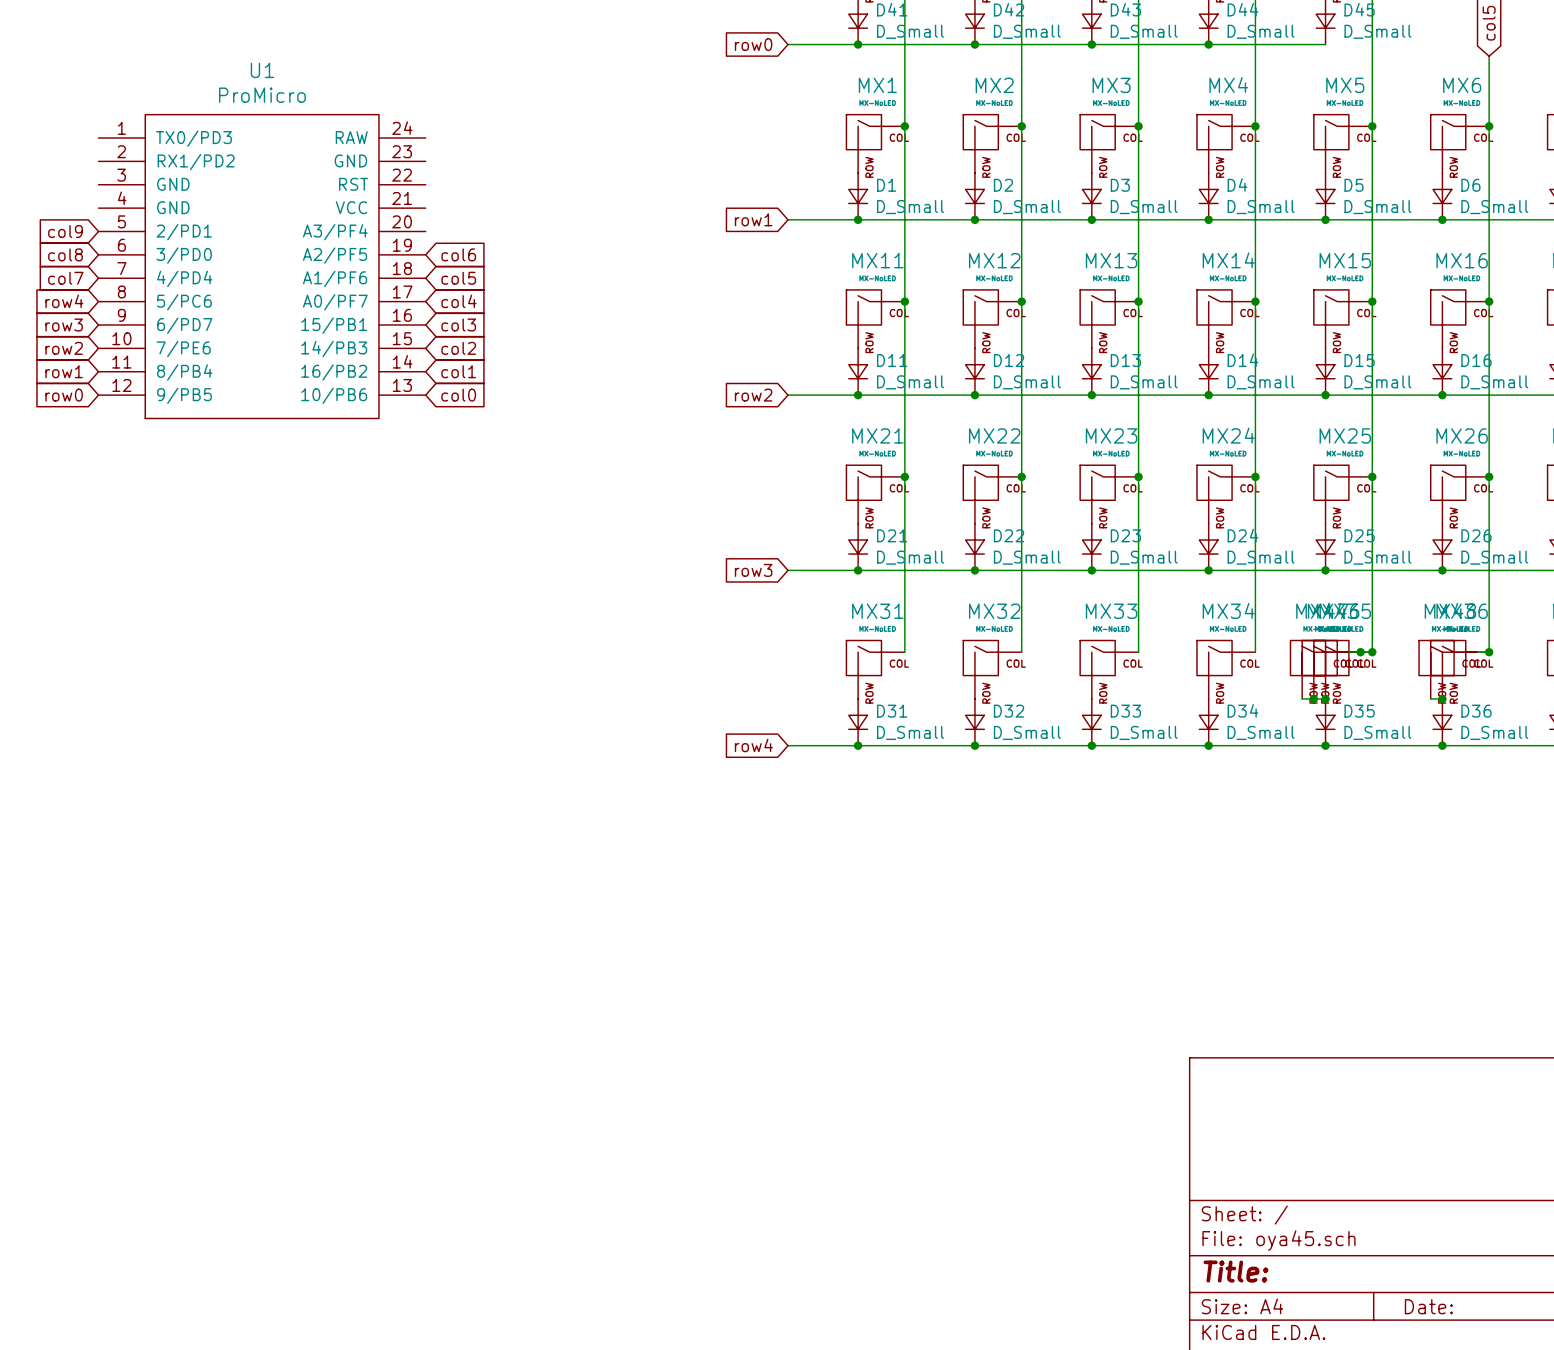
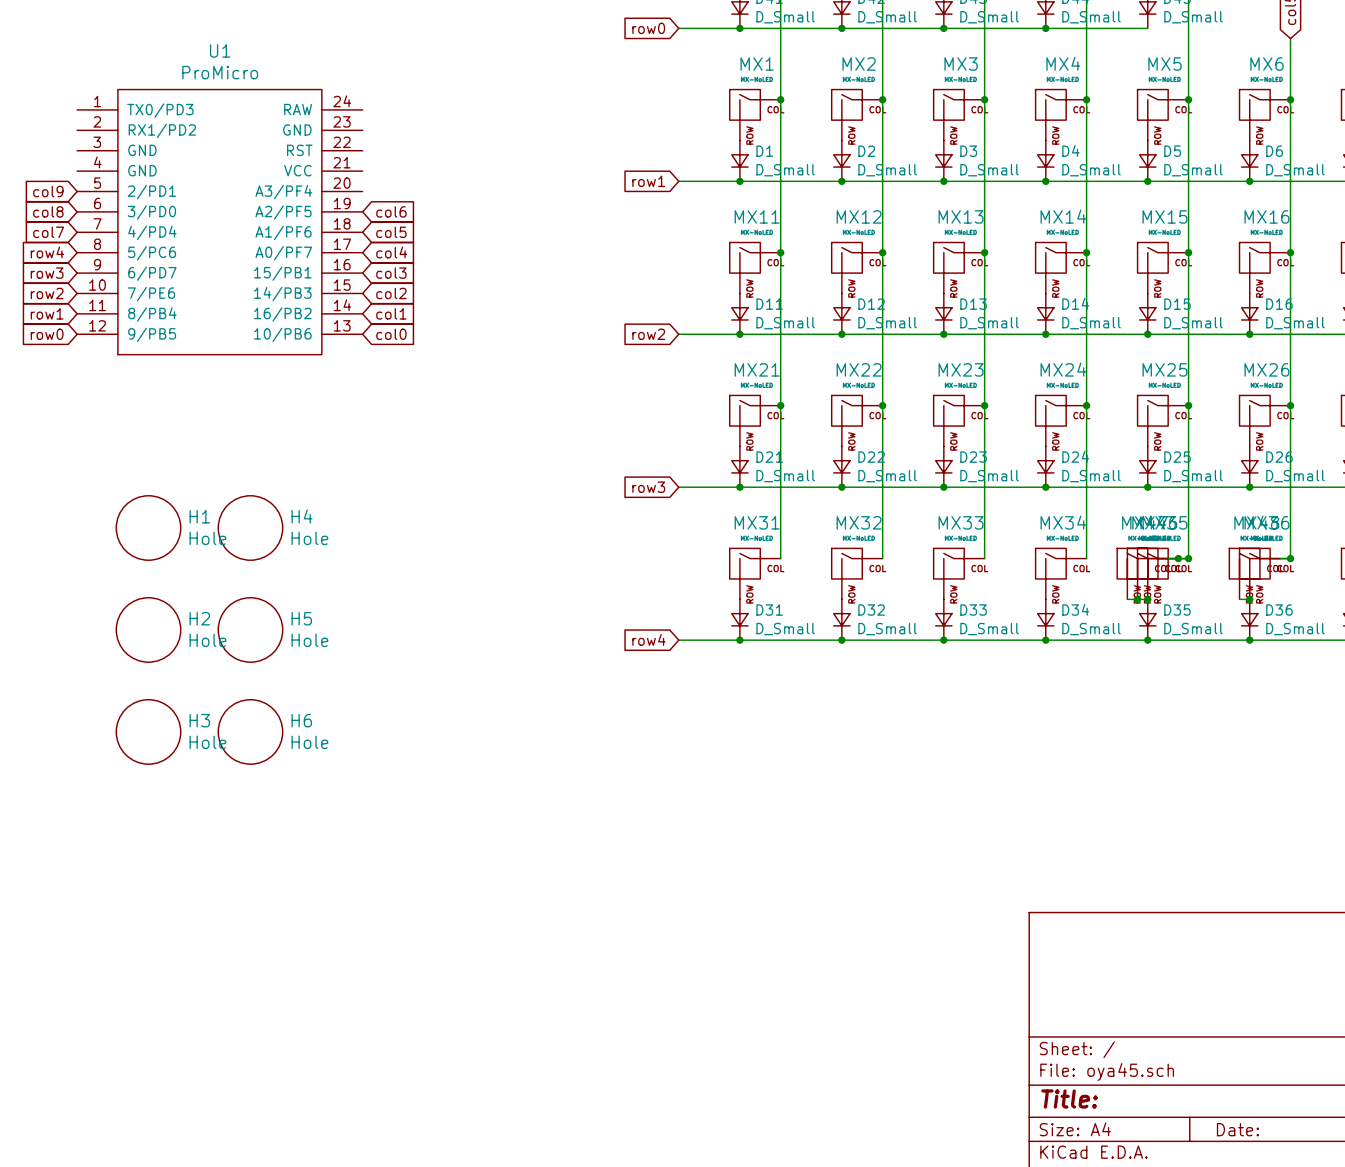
H1: none -> Hole (148, 528)
H4: none -> Hole (250, 528)
H2: none -> Hole (148, 629)
H5: none -> Hole (250, 629)
H3: none -> Hole (148, 731)
H6: none -> Hole (250, 731)

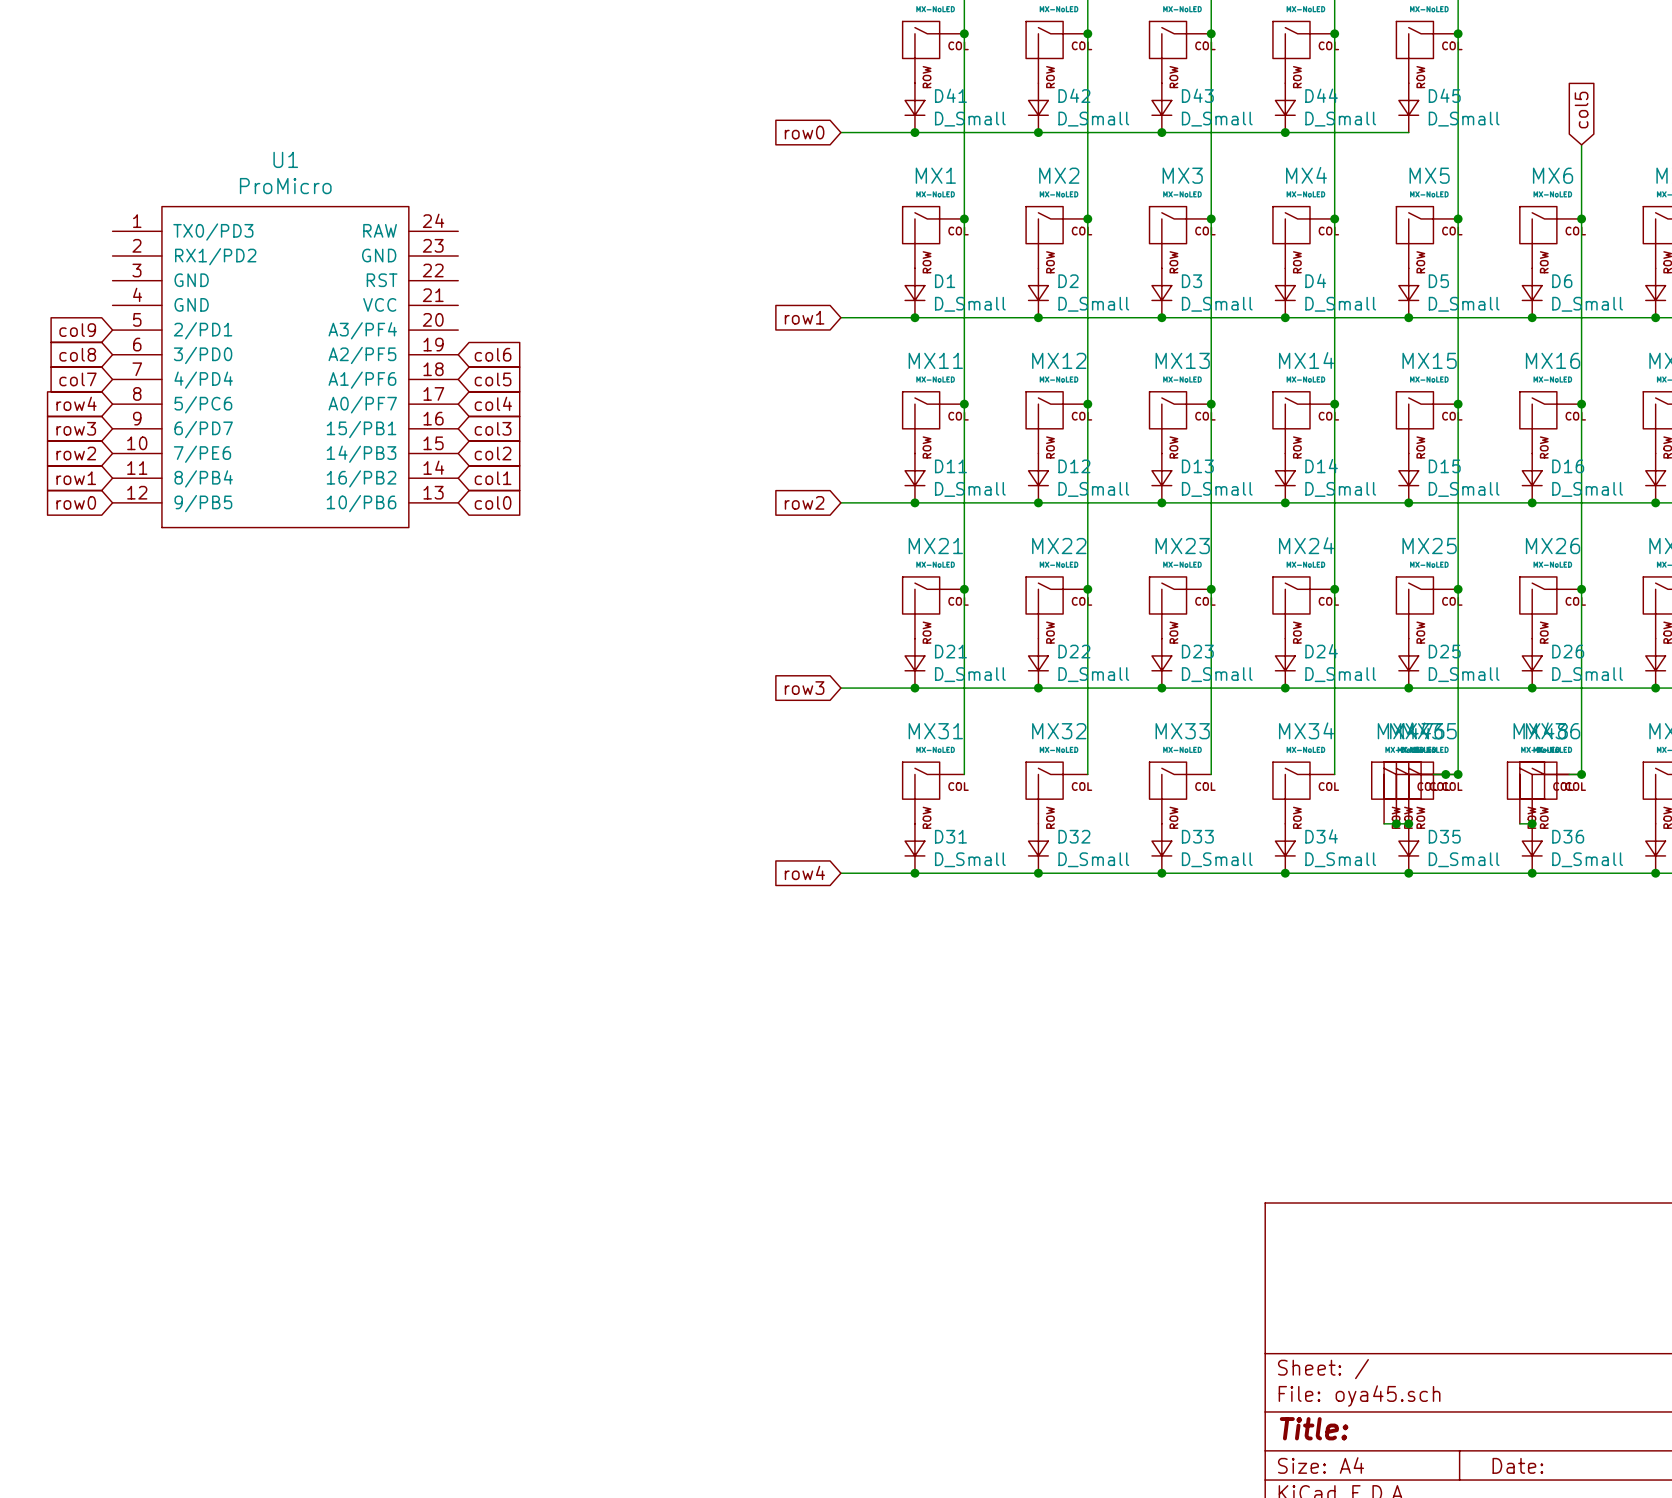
H1: Hole (148, 528) -> none
H4: Hole (250, 528) -> none
H2: Hole (148, 629) -> none
H5: Hole (250, 629) -> none
H3: Hole (148, 731) -> none
H6: Hole (250, 731) -> none

